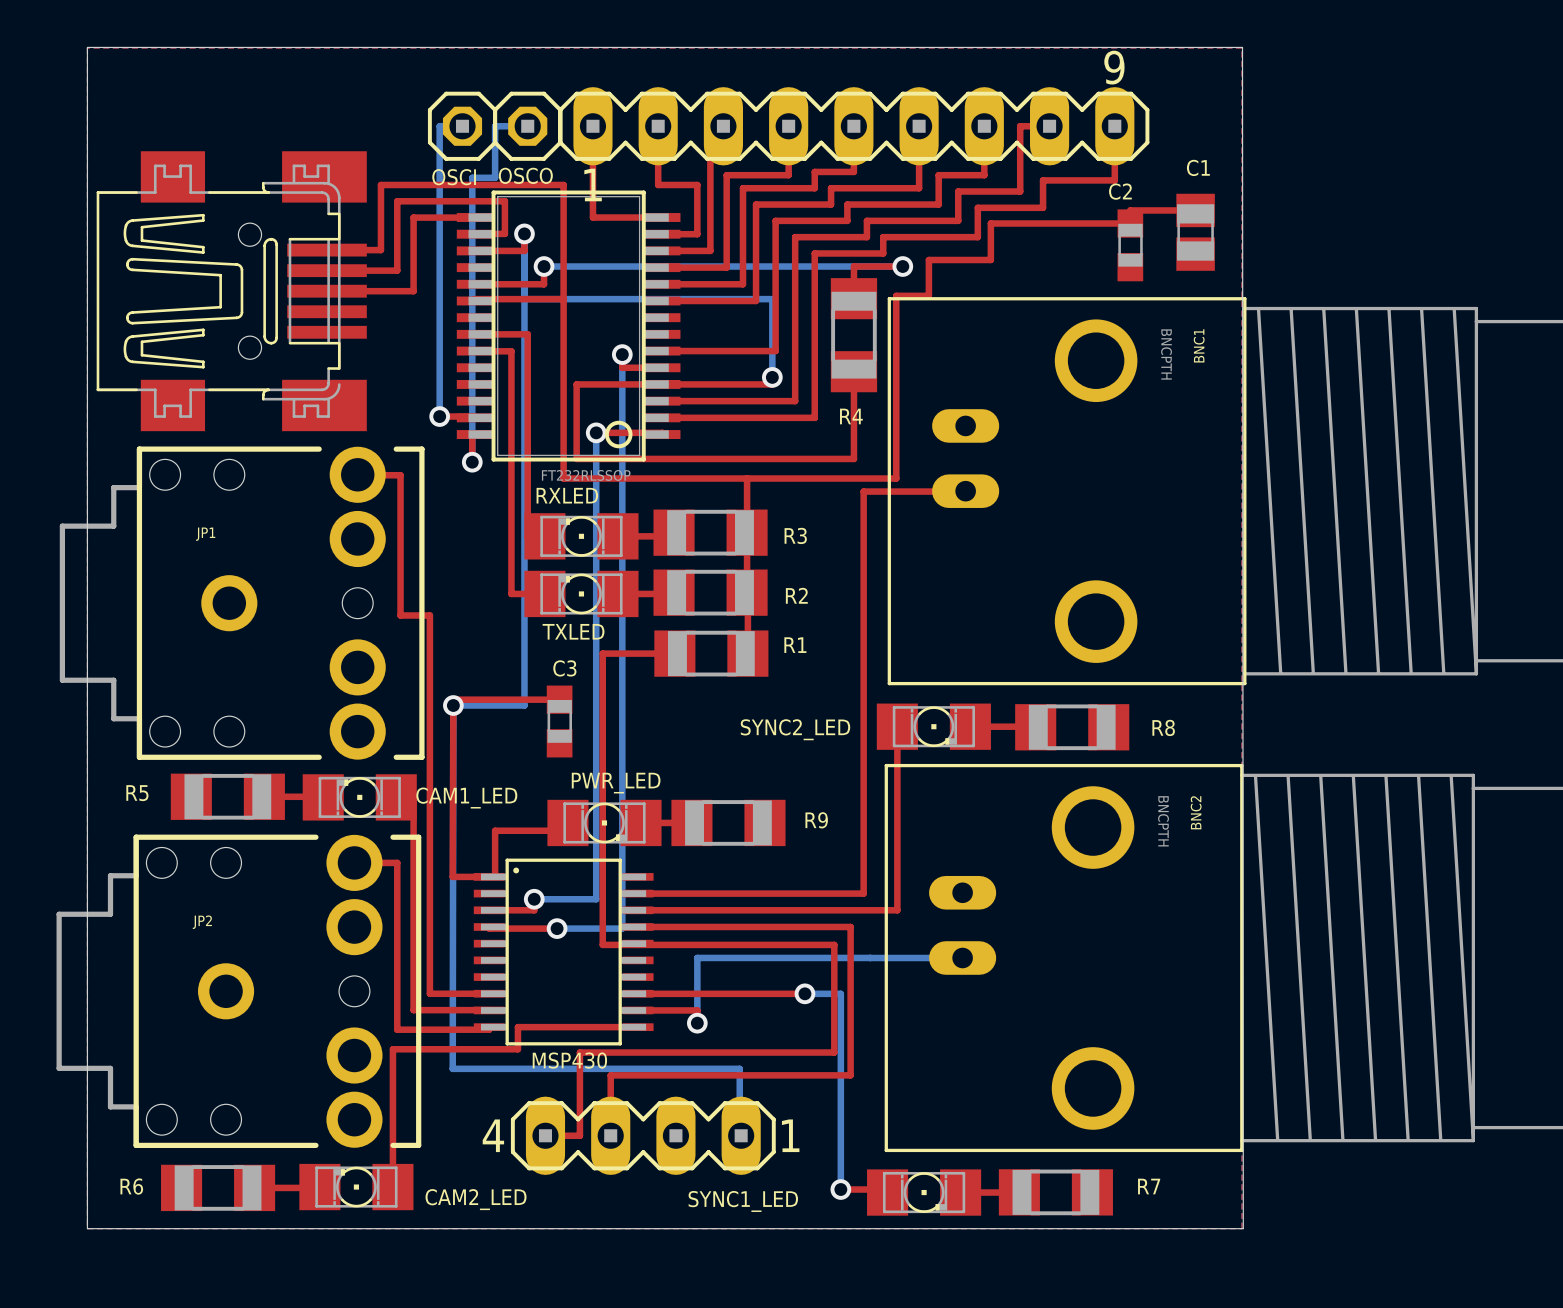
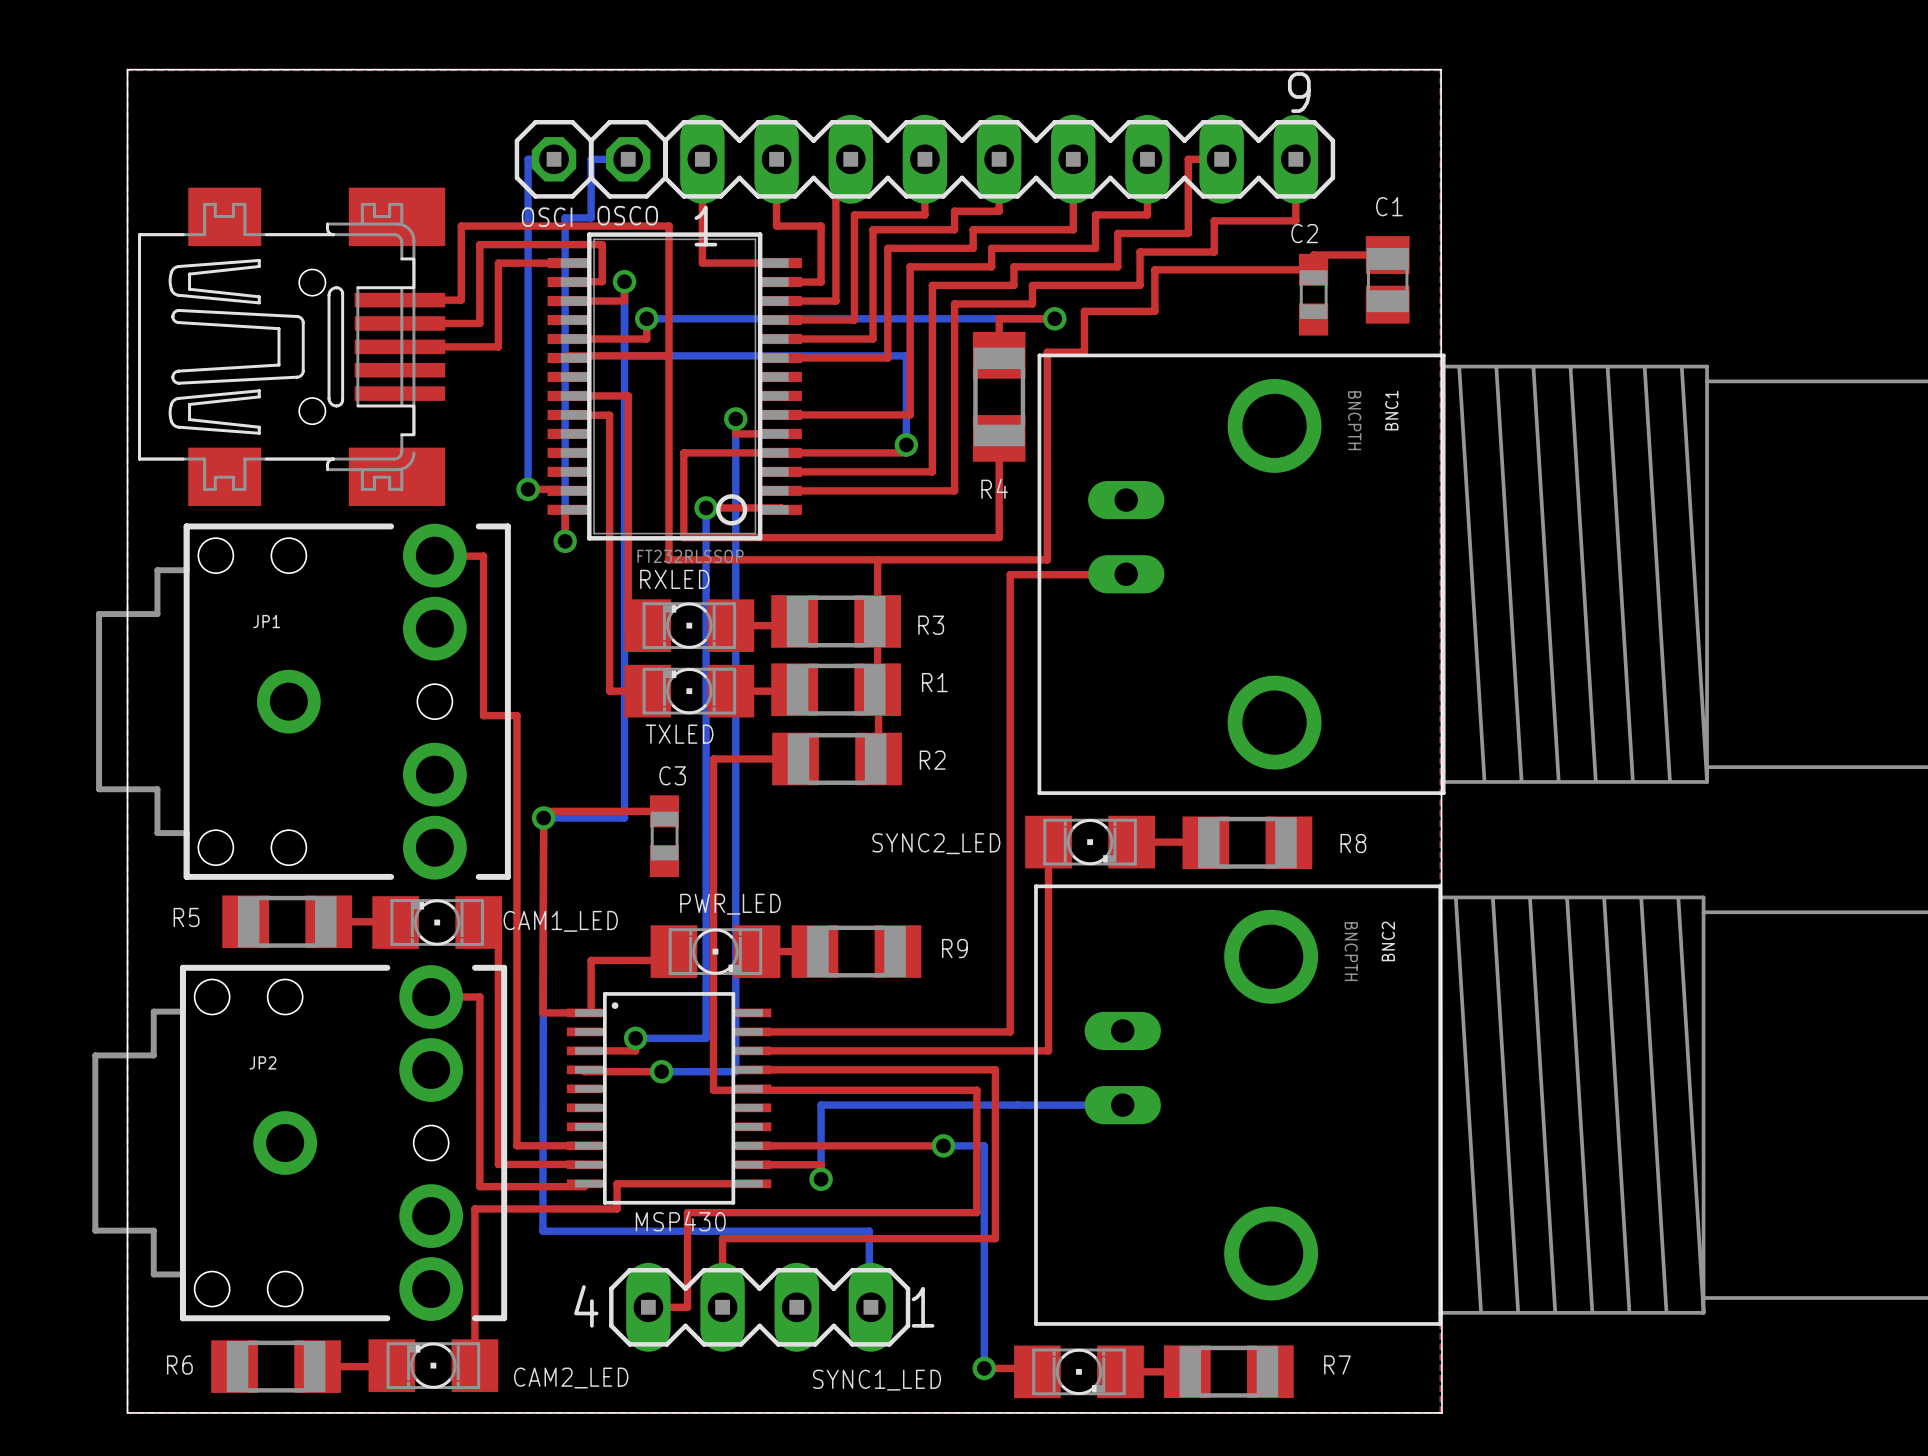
R2 name position: R2 (796, 595) -> R2 (932, 760)
R1 name position: R1 (795, 645) -> R1 (934, 682)

